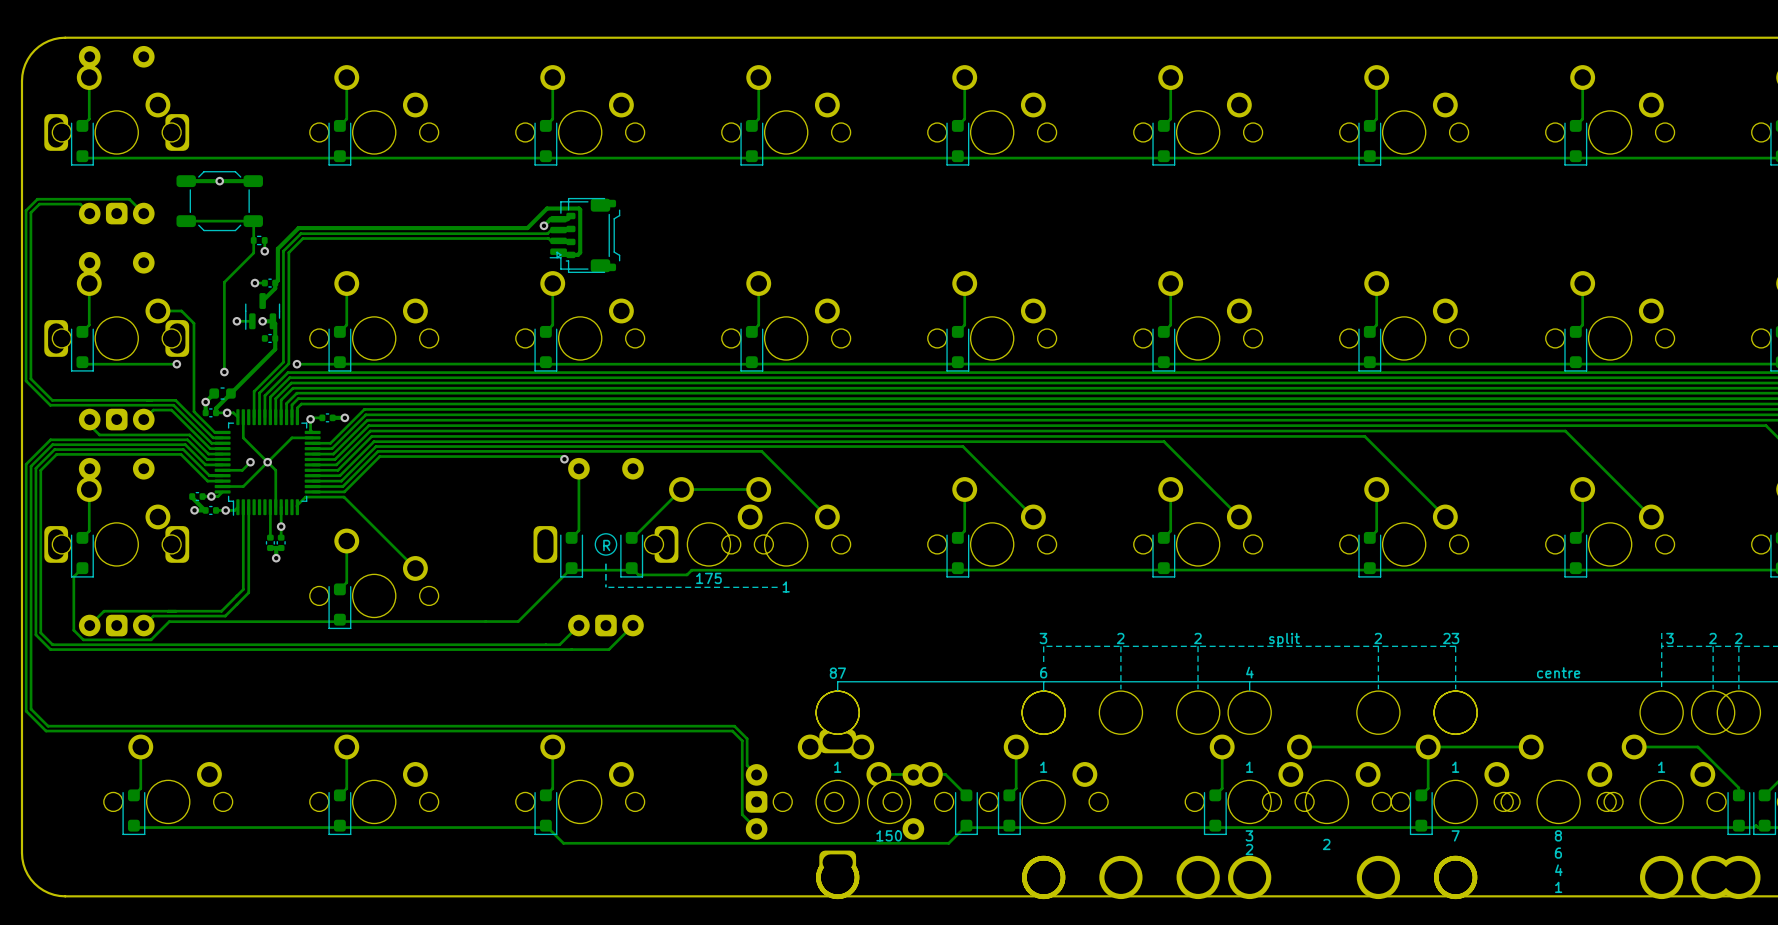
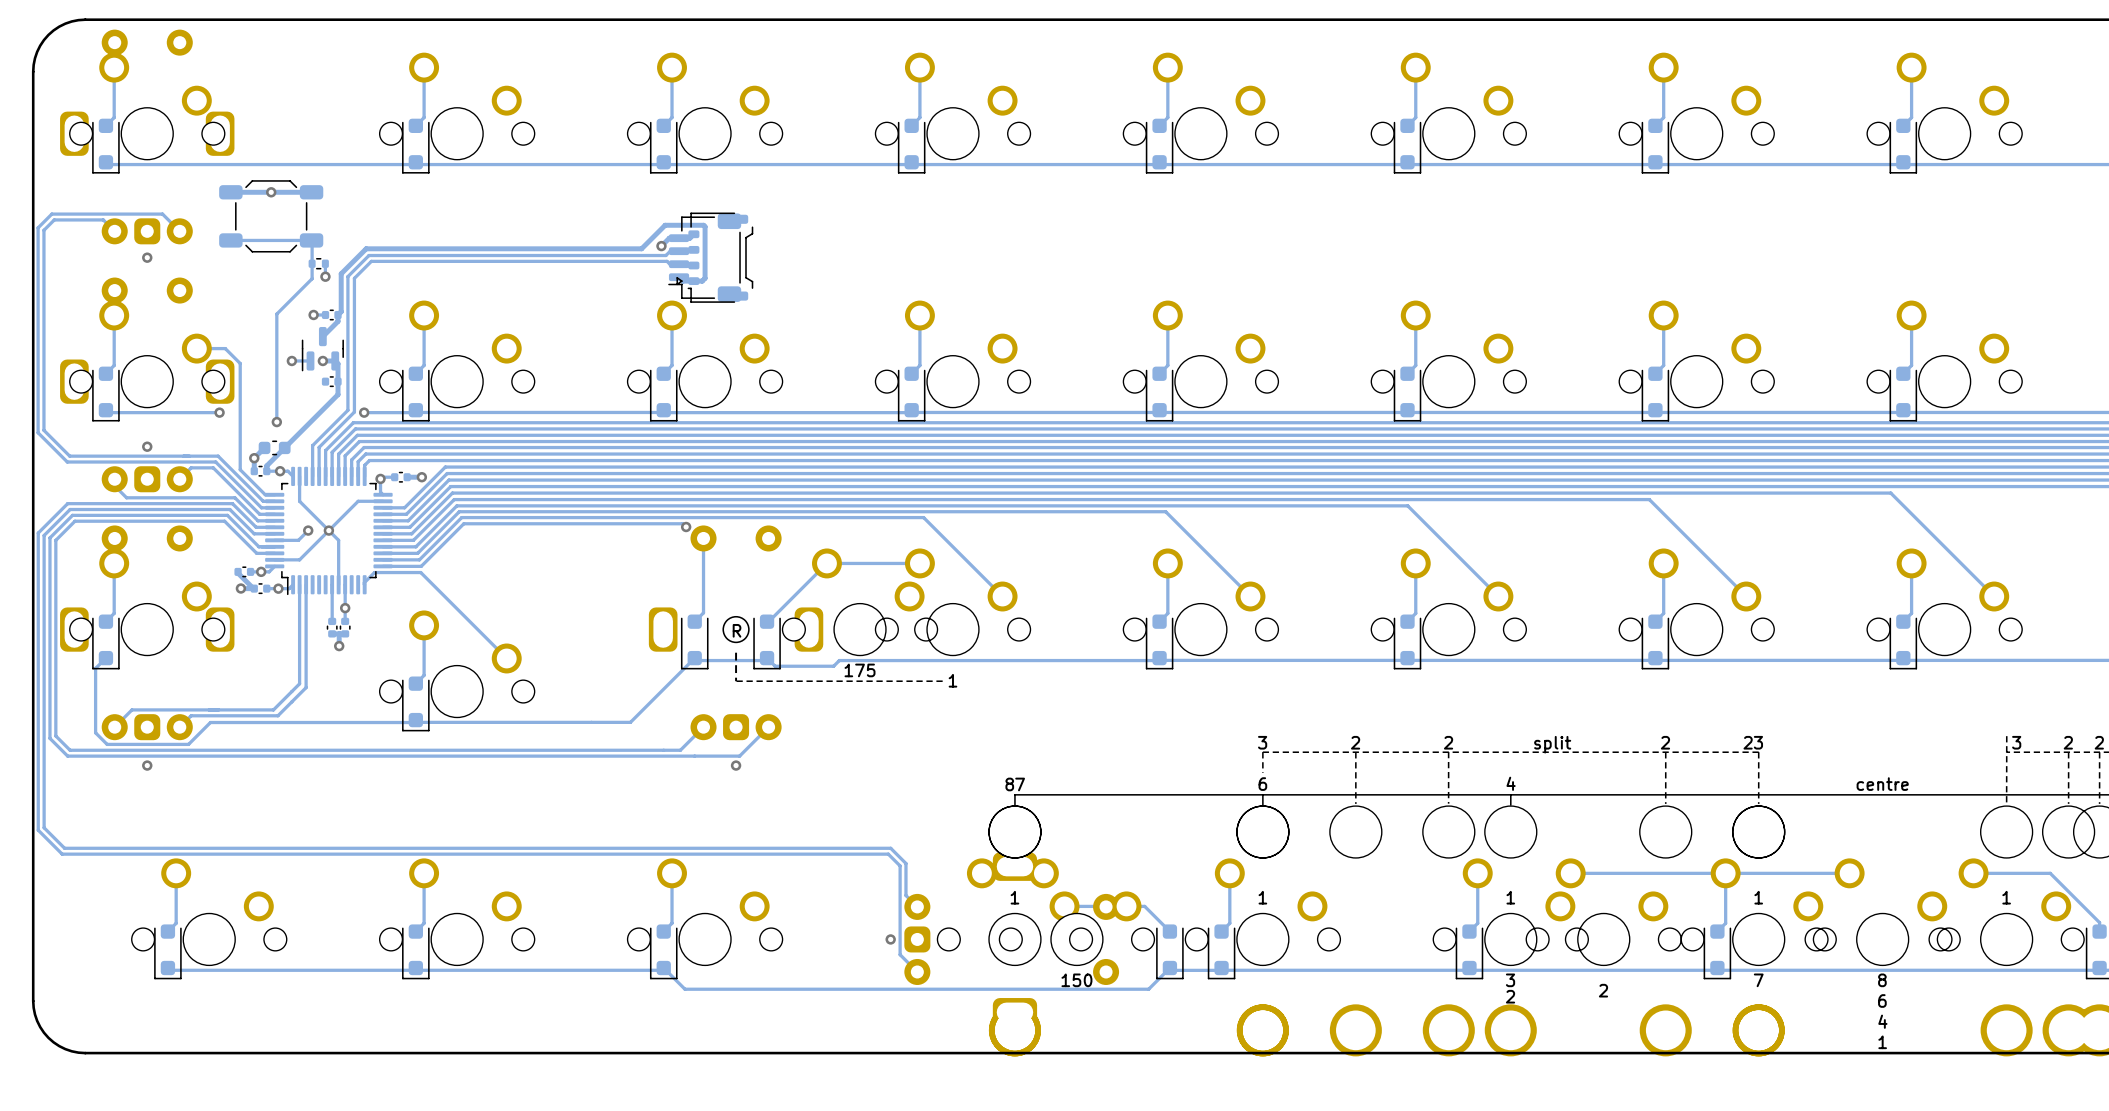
via: none -> (147, 257)
via: none -> (147, 446)
via: none -> (147, 765)
via: none -> (736, 765)
via: none -> (890, 939)

